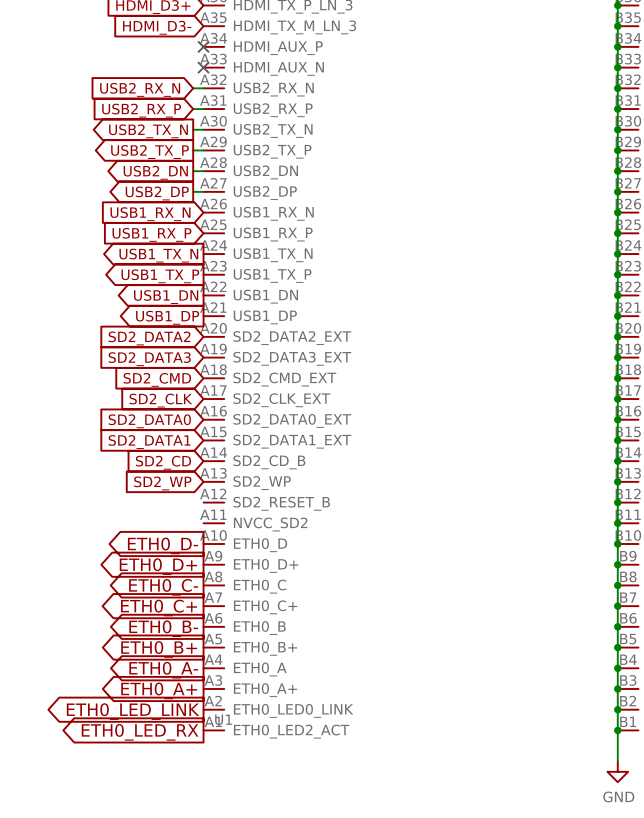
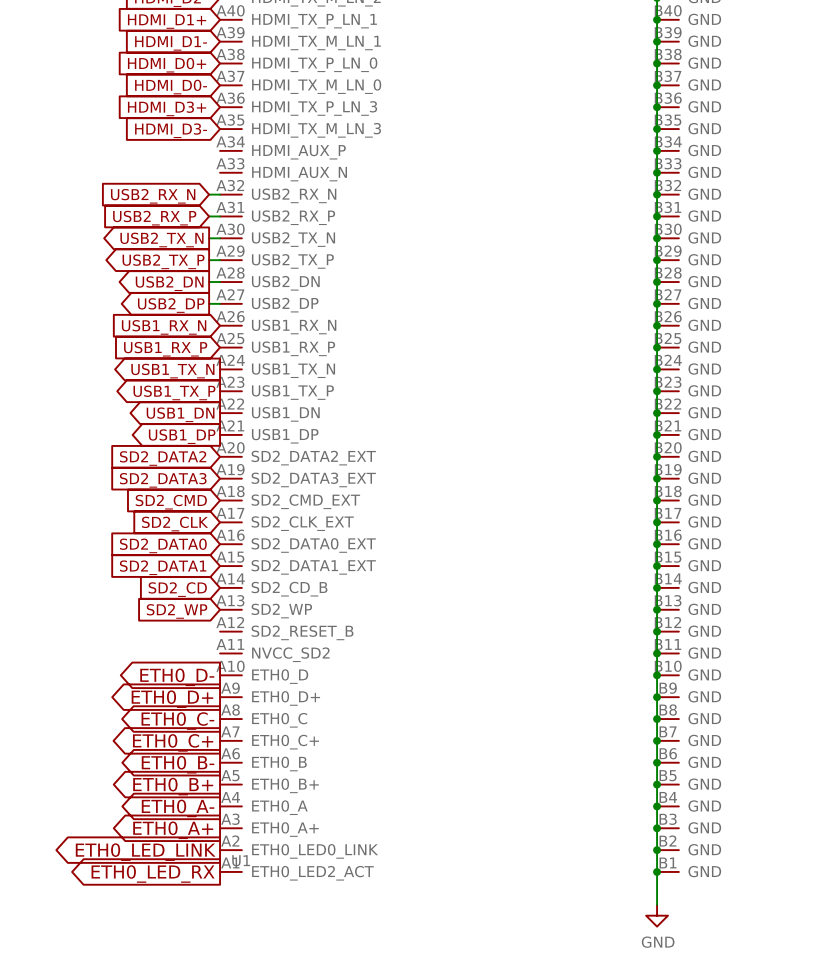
no-connect mark: (203, 46) -> none
no-connect mark: (203, 67) -> none

